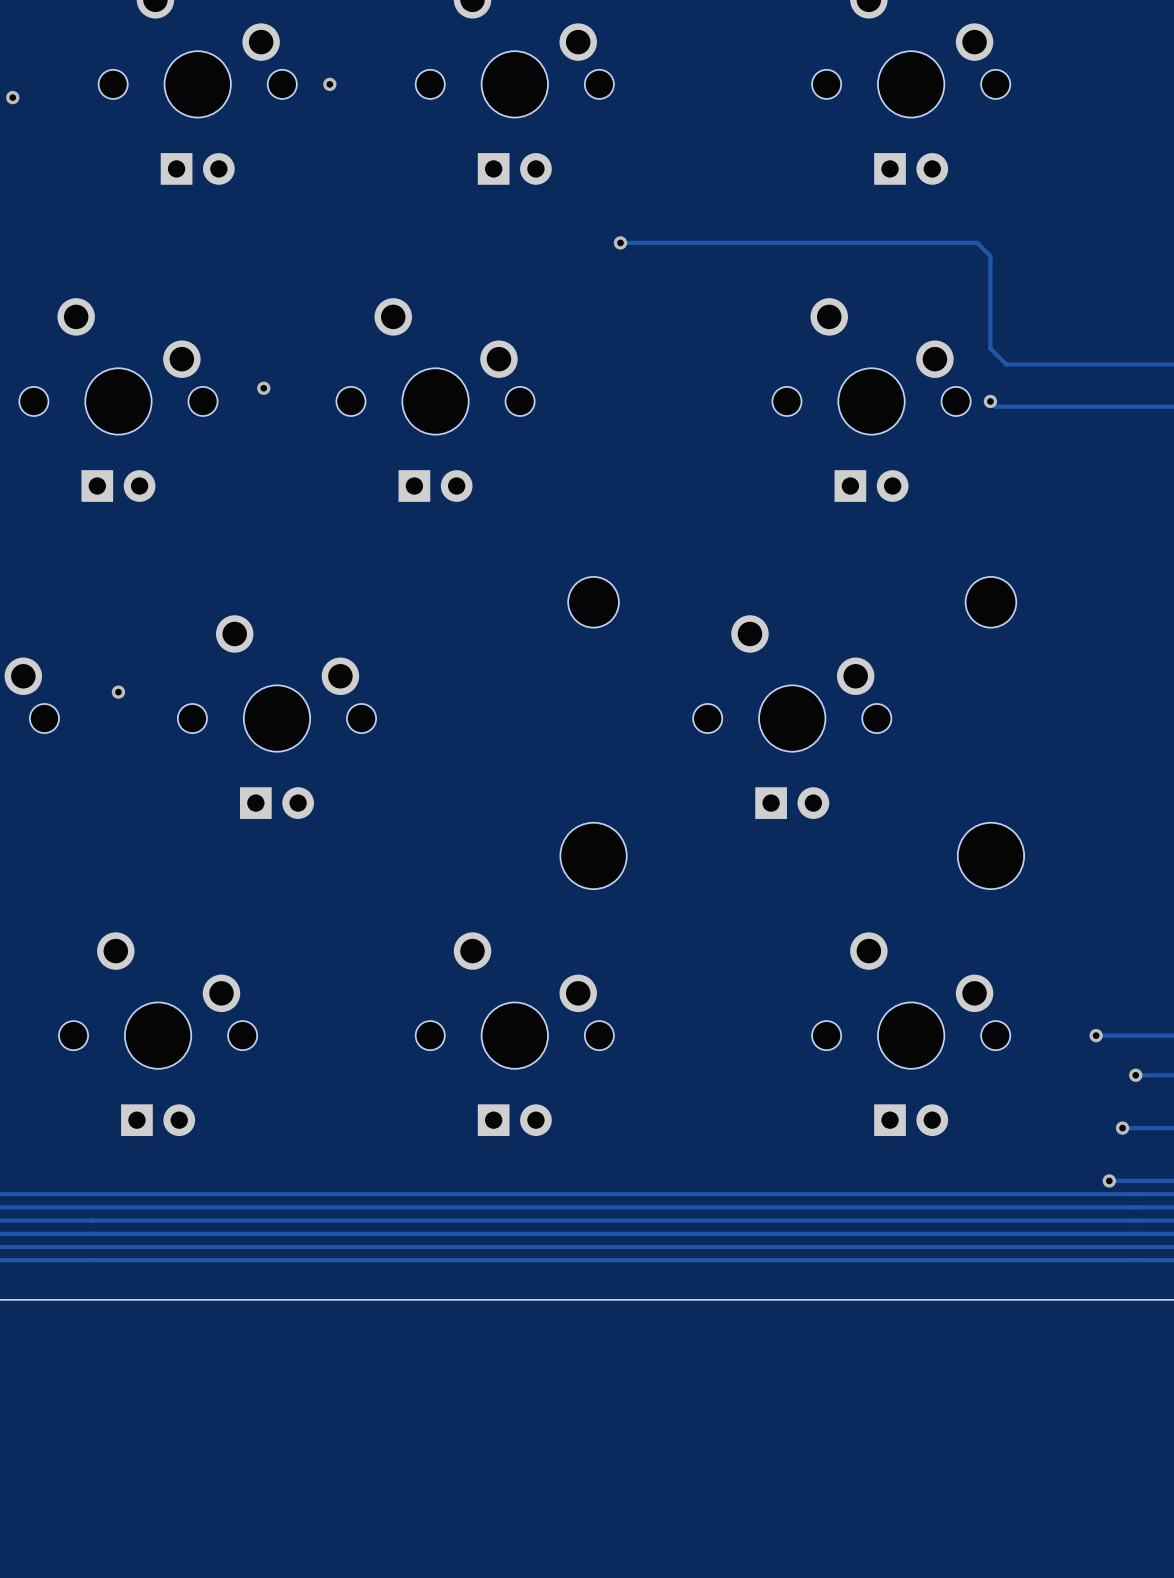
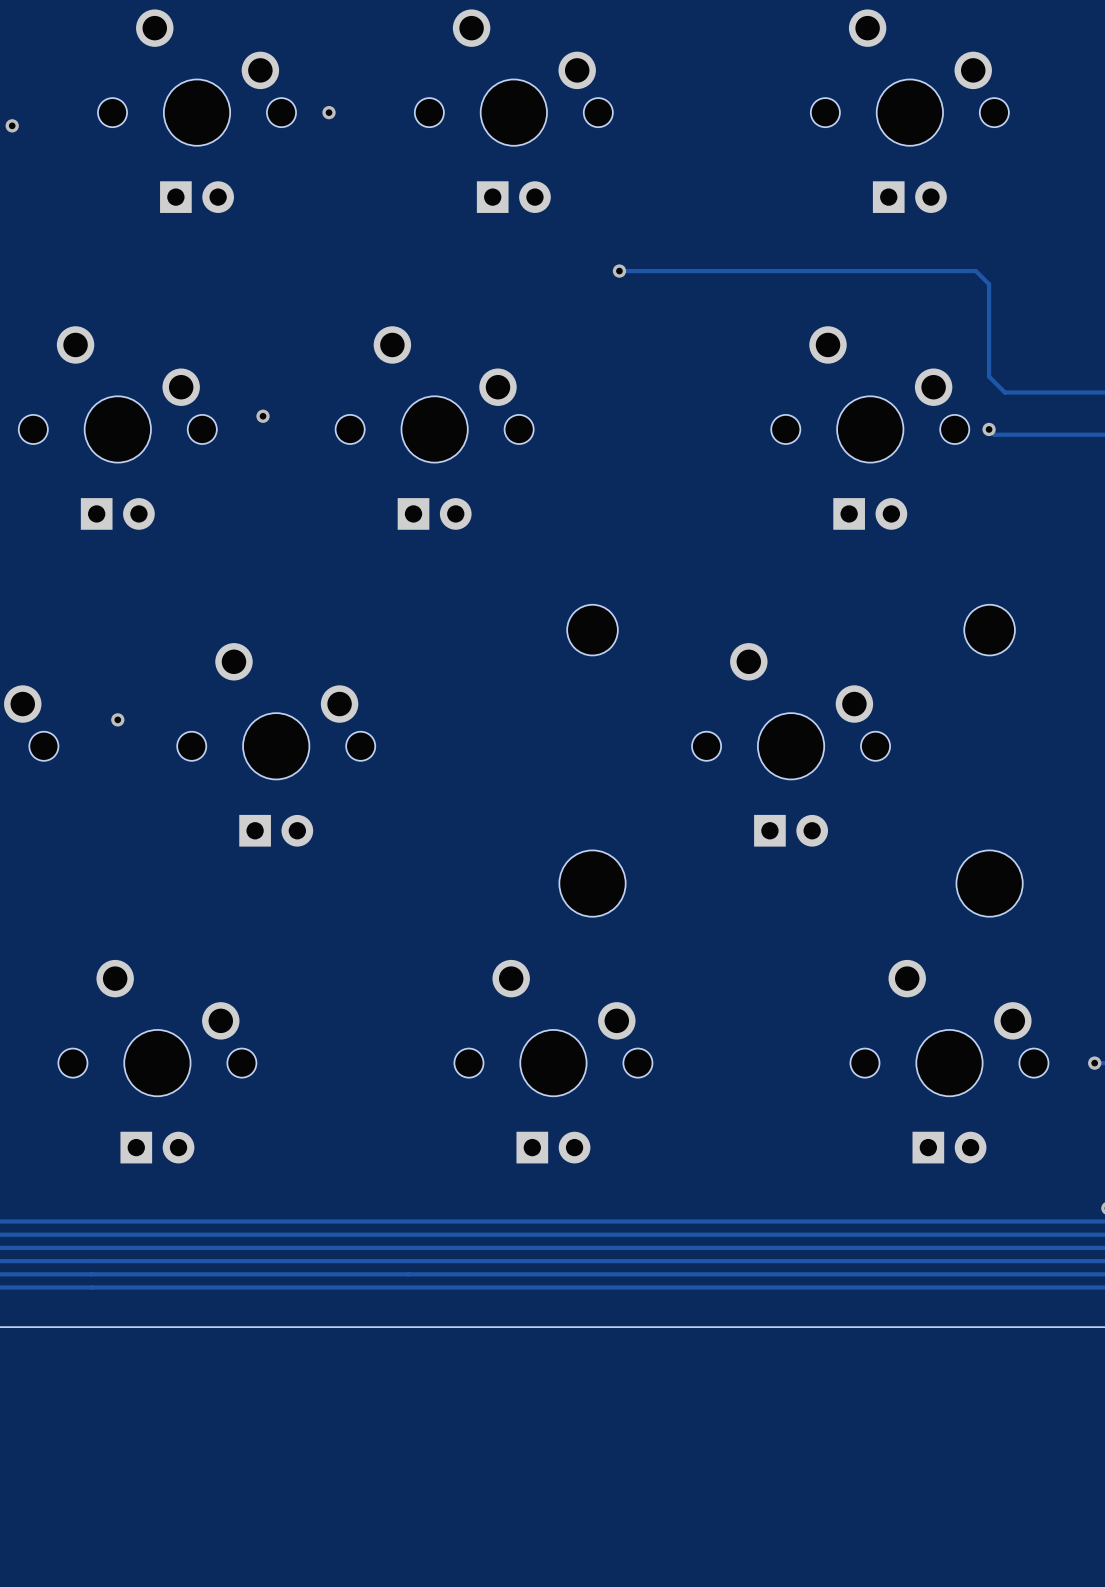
part position: (514, 1034) -> (553, 1061)
part position: (911, 1034) -> (949, 1061)

